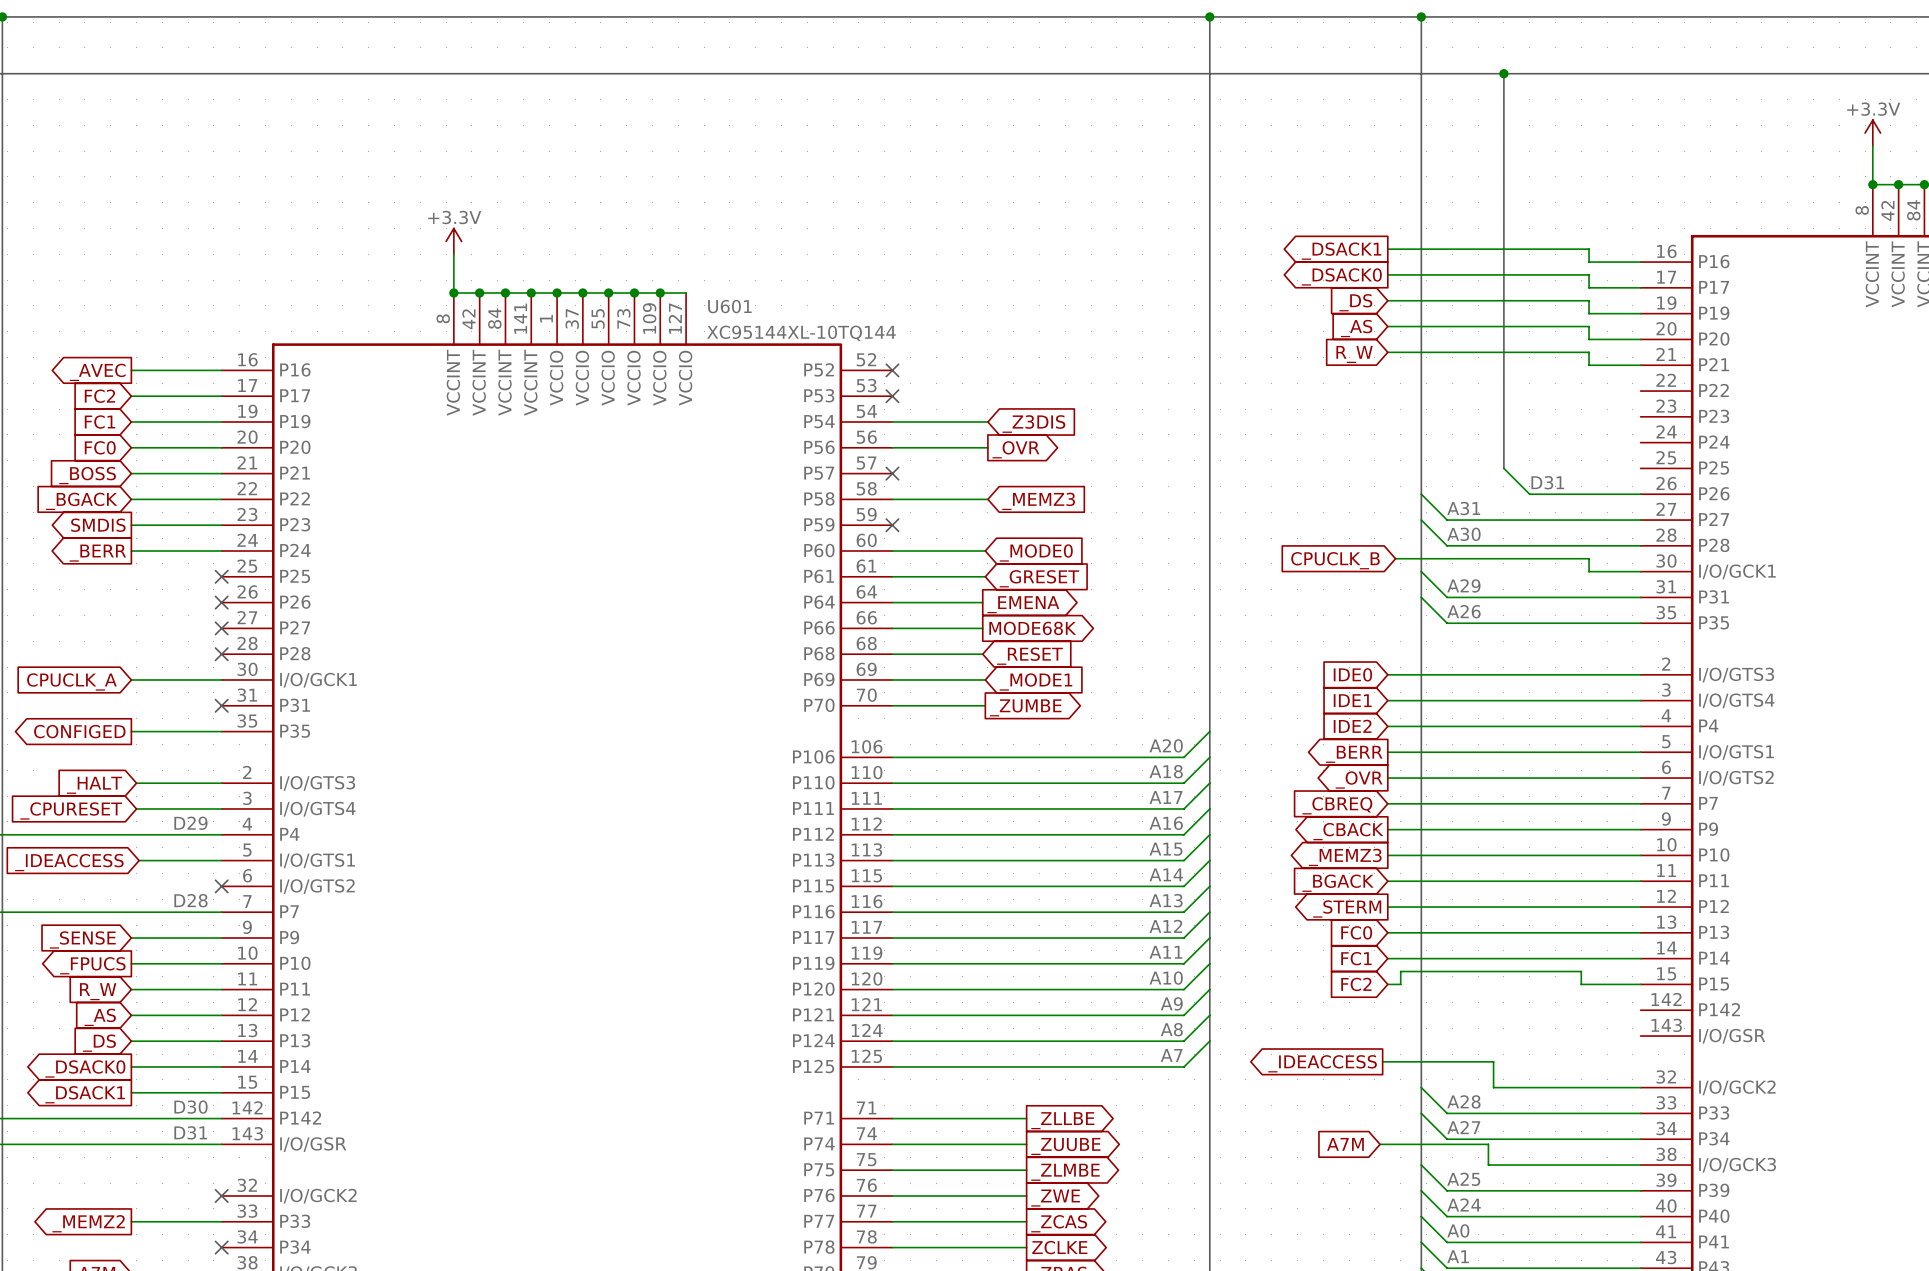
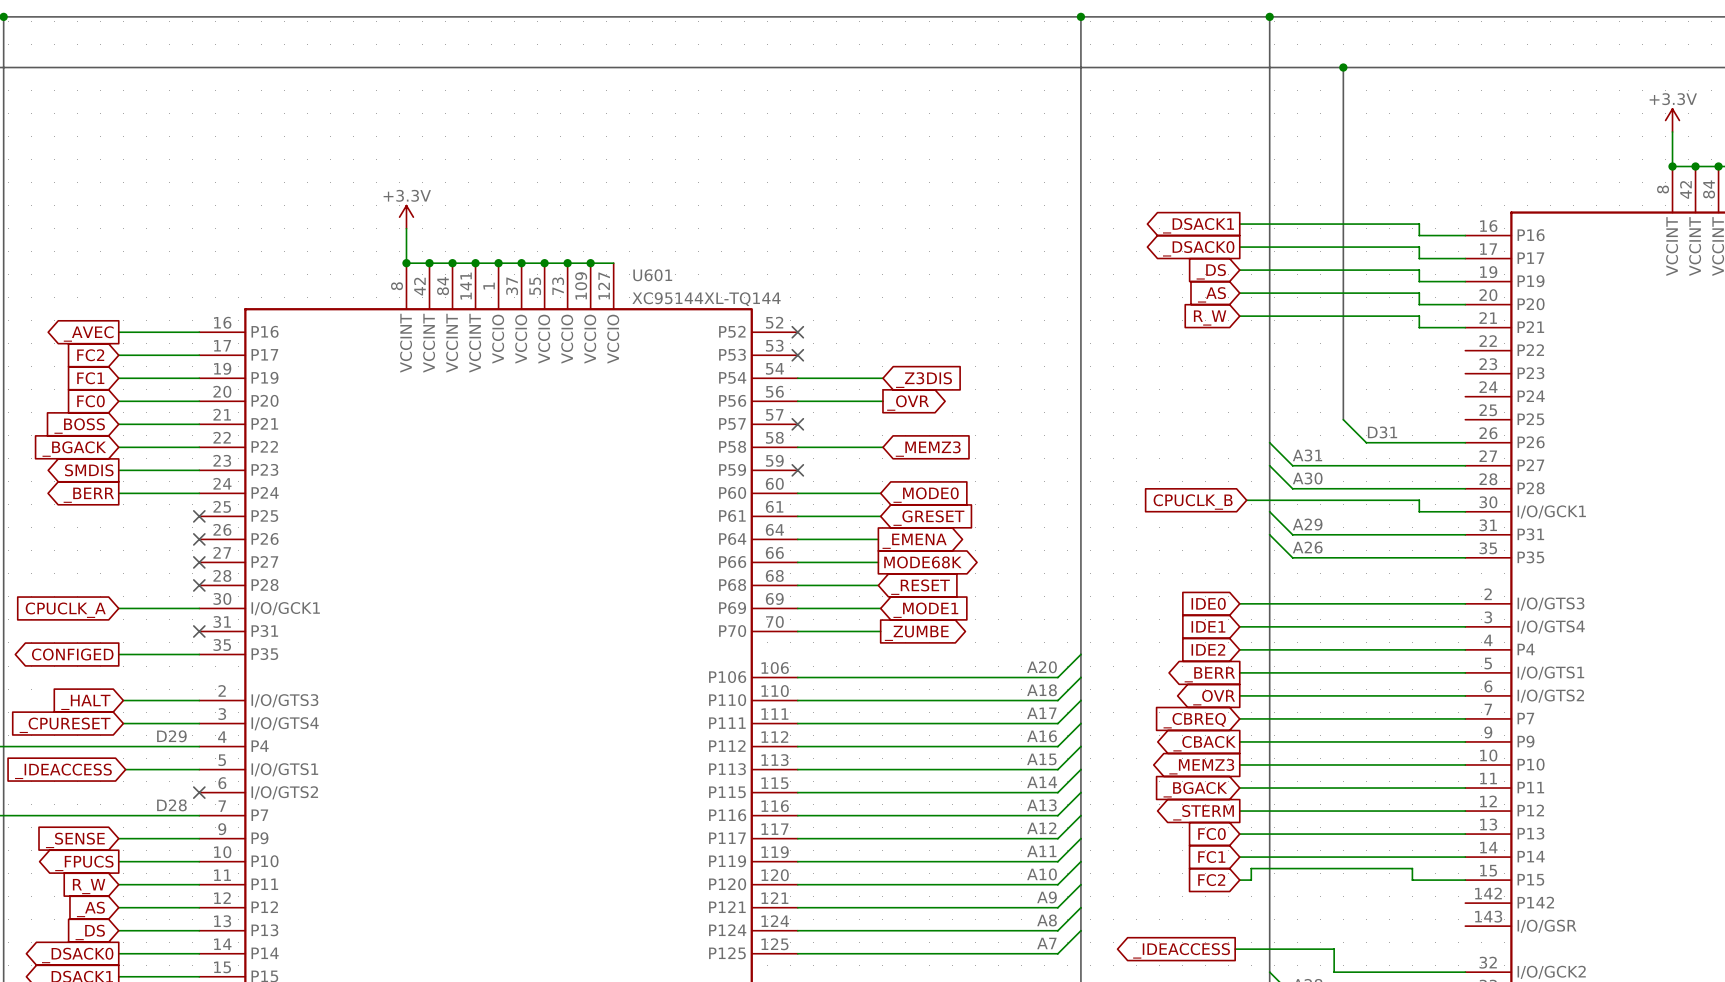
U601 value: XC95144XL-10TQ144 (801, 333) -> XC95144XL-TQ144 (706, 299)

